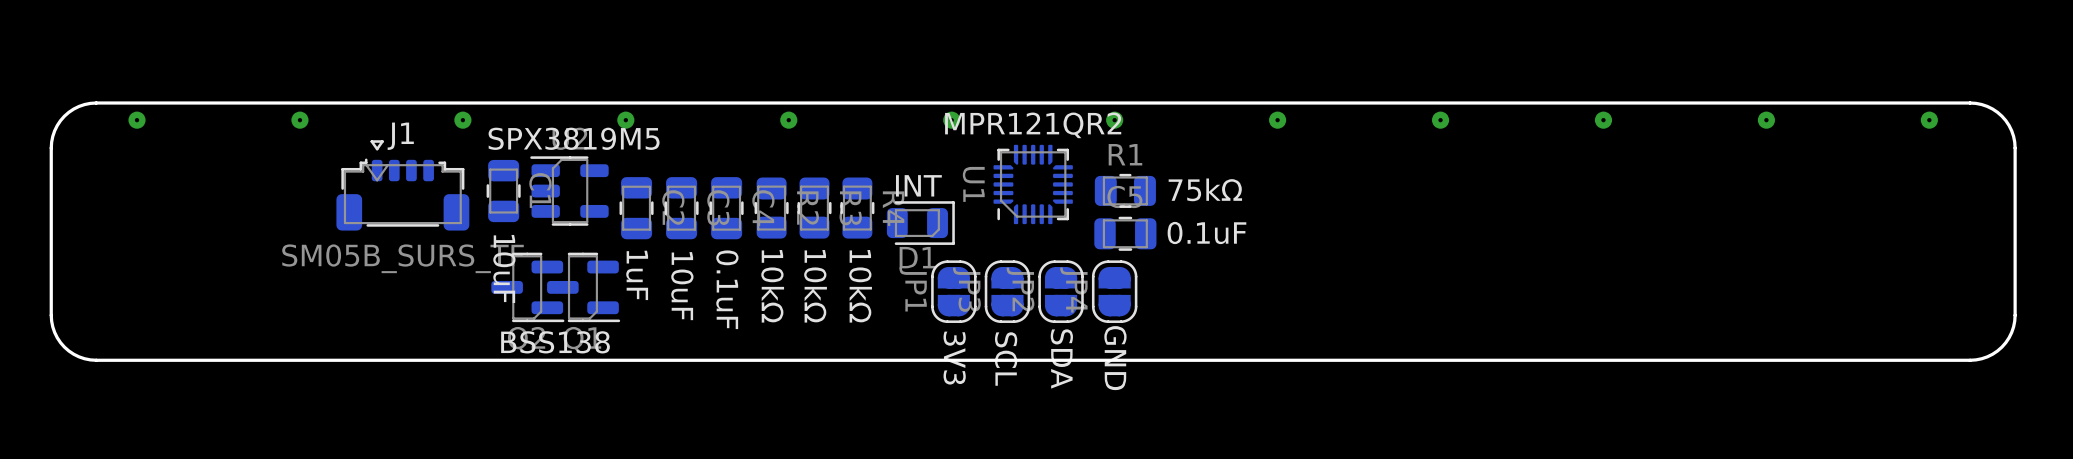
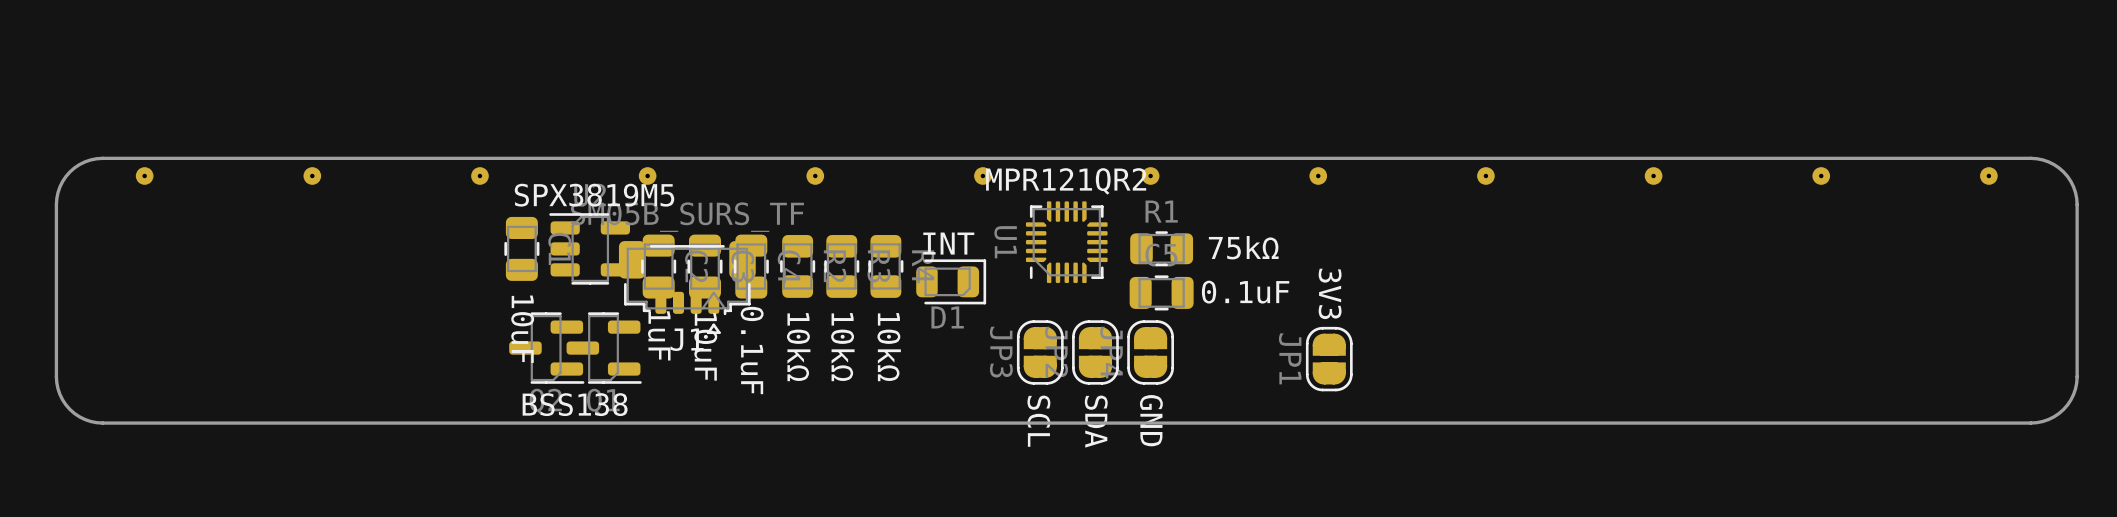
J1 rotation: 0° (402, 185) -> 180° (687, 287)
J1 position: (402, 185) -> (687, 287)
JP1 position: (953, 291) -> (1329, 359)
JP1 value position: 3V3 (954, 358) -> 3V3 (1330, 293)

